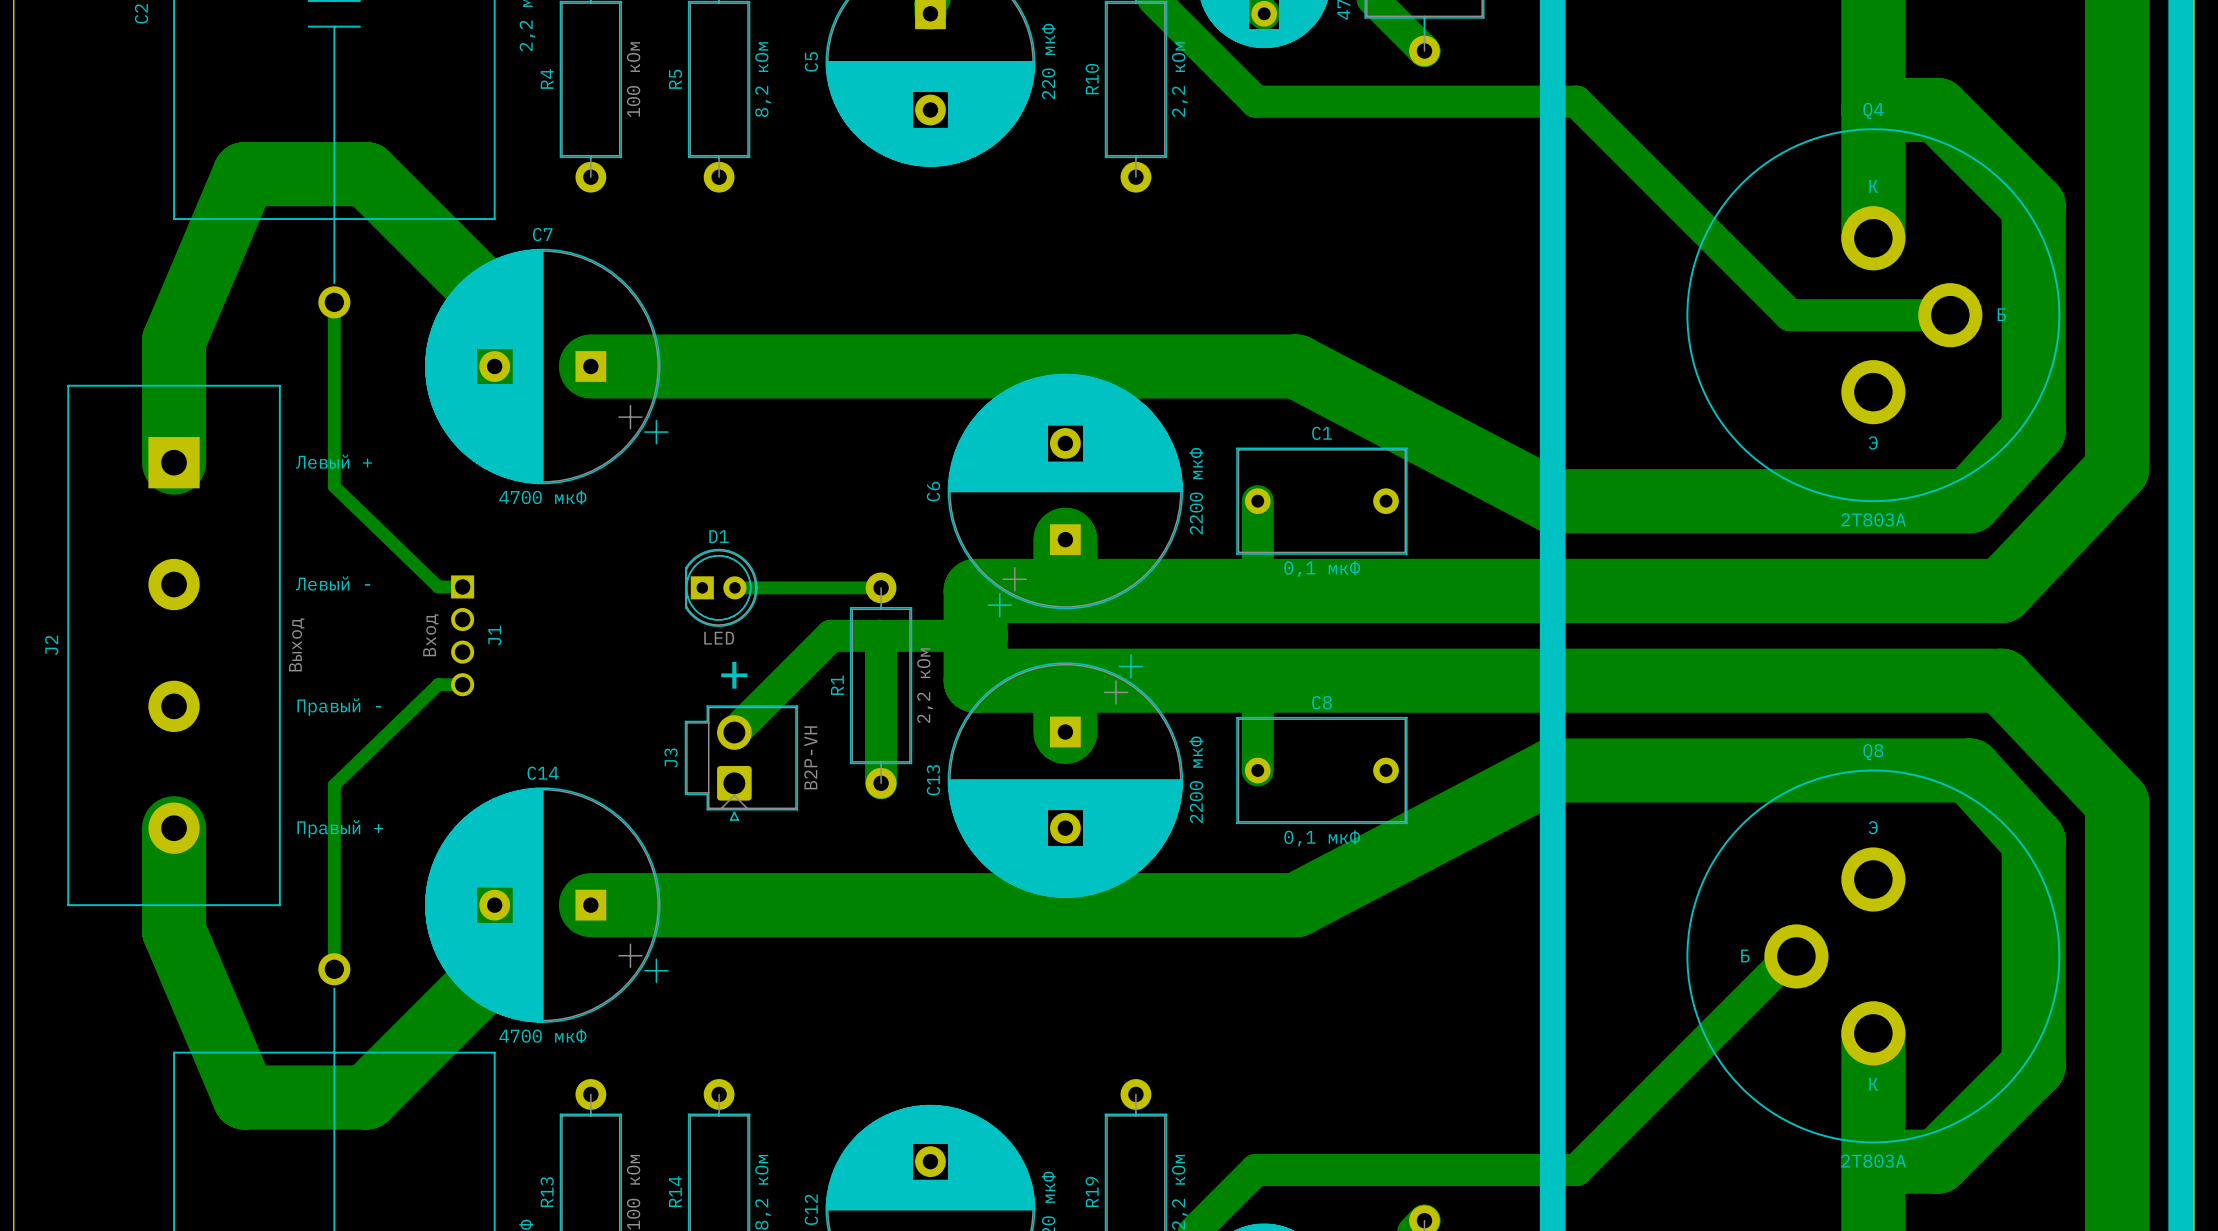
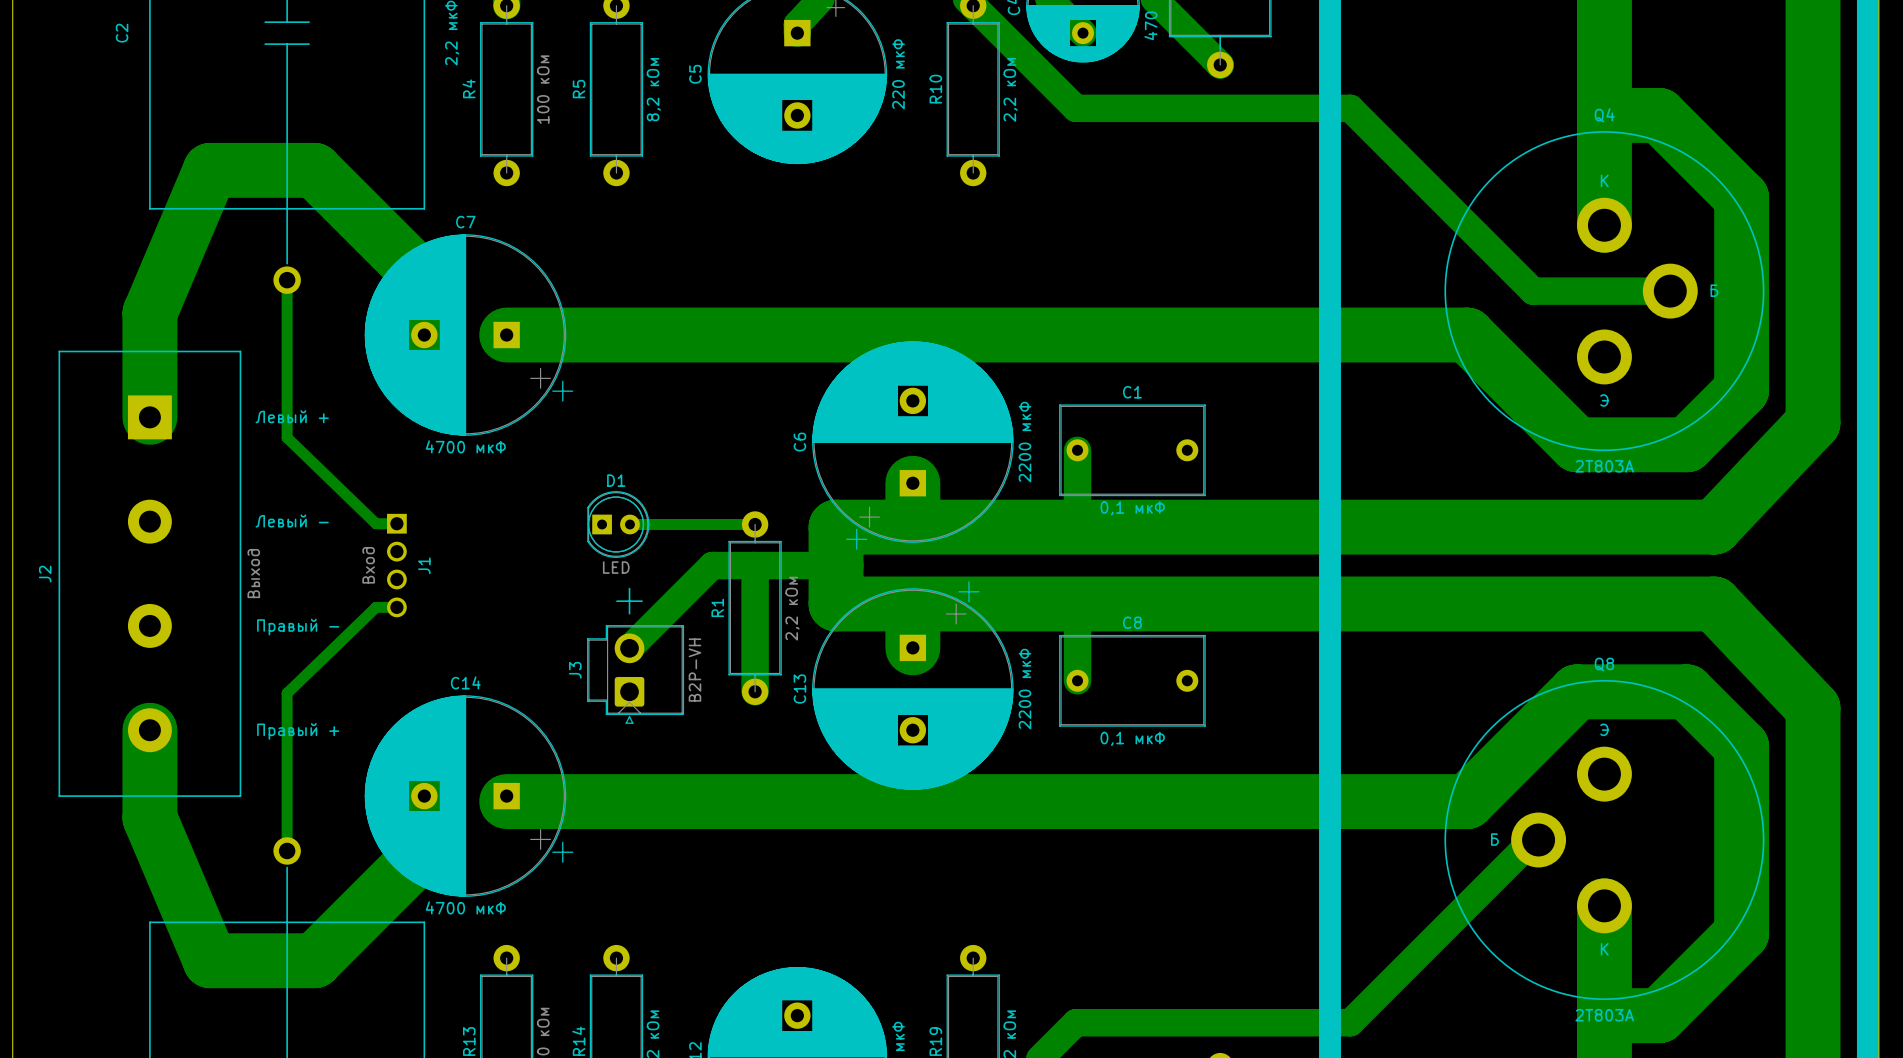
bottom track: (1296, 366) (1552, 501) (1969, 501) (2033, 430) -> (1110, 335) (1467, 335) (1577, 444) (1686, 444) (1741, 389)
bottom track: (2033, 847) (2033, 841) (1969, 770) (1552, 770) (1296, 905) (590, 905) -> (1741, 746) (1686, 691) (1577, 691) (1467, 801) (506, 801)

